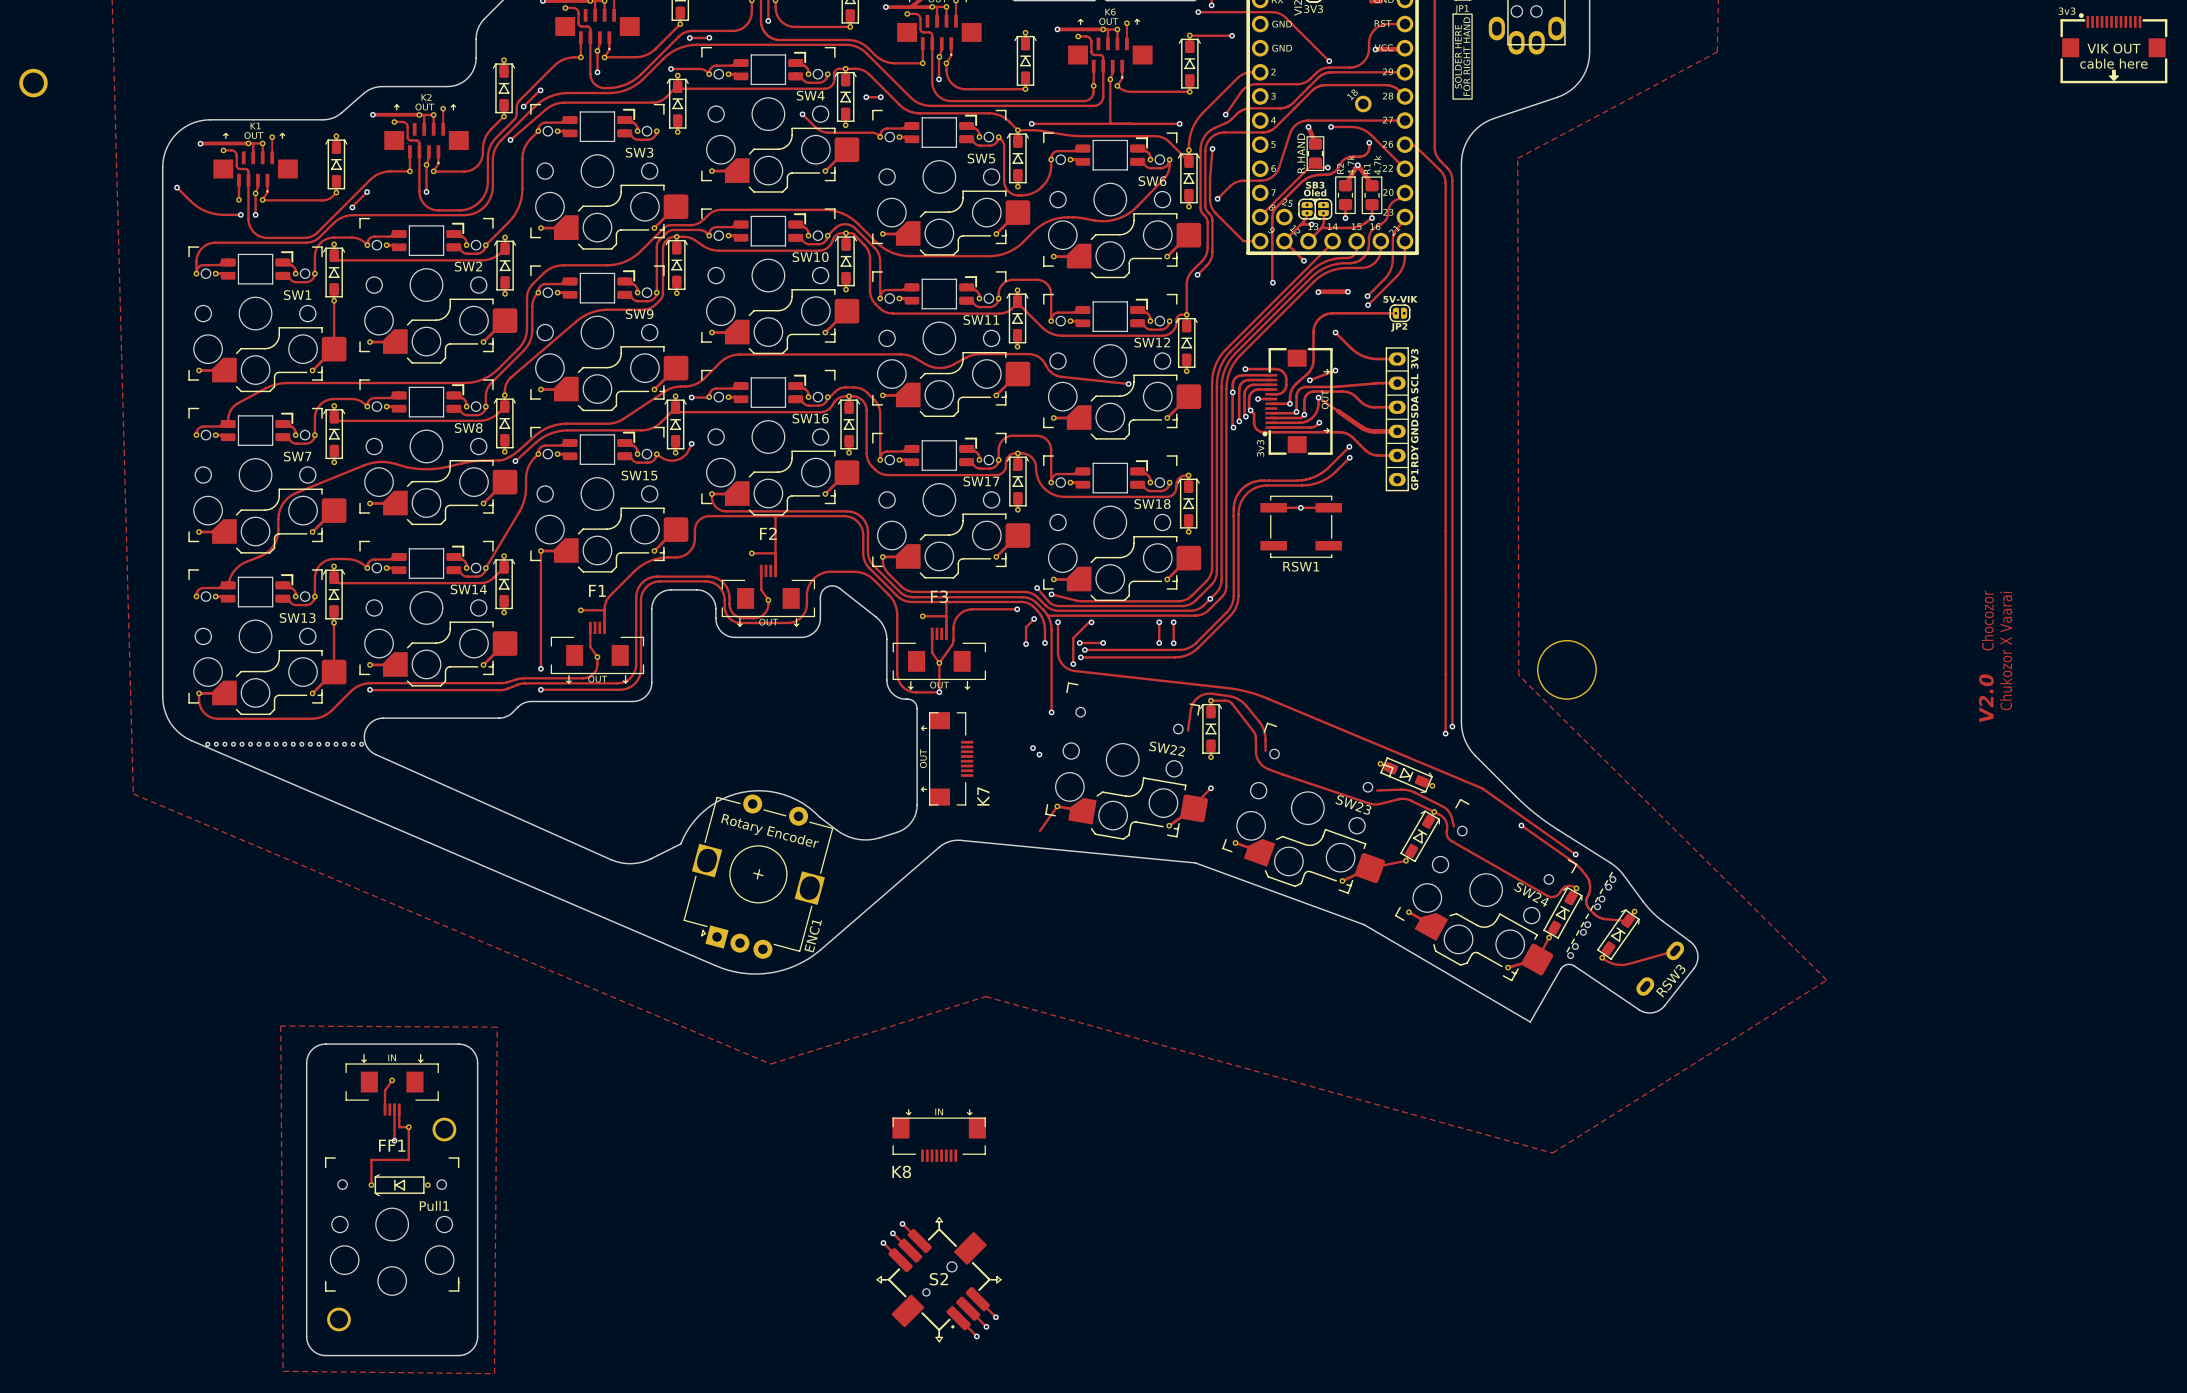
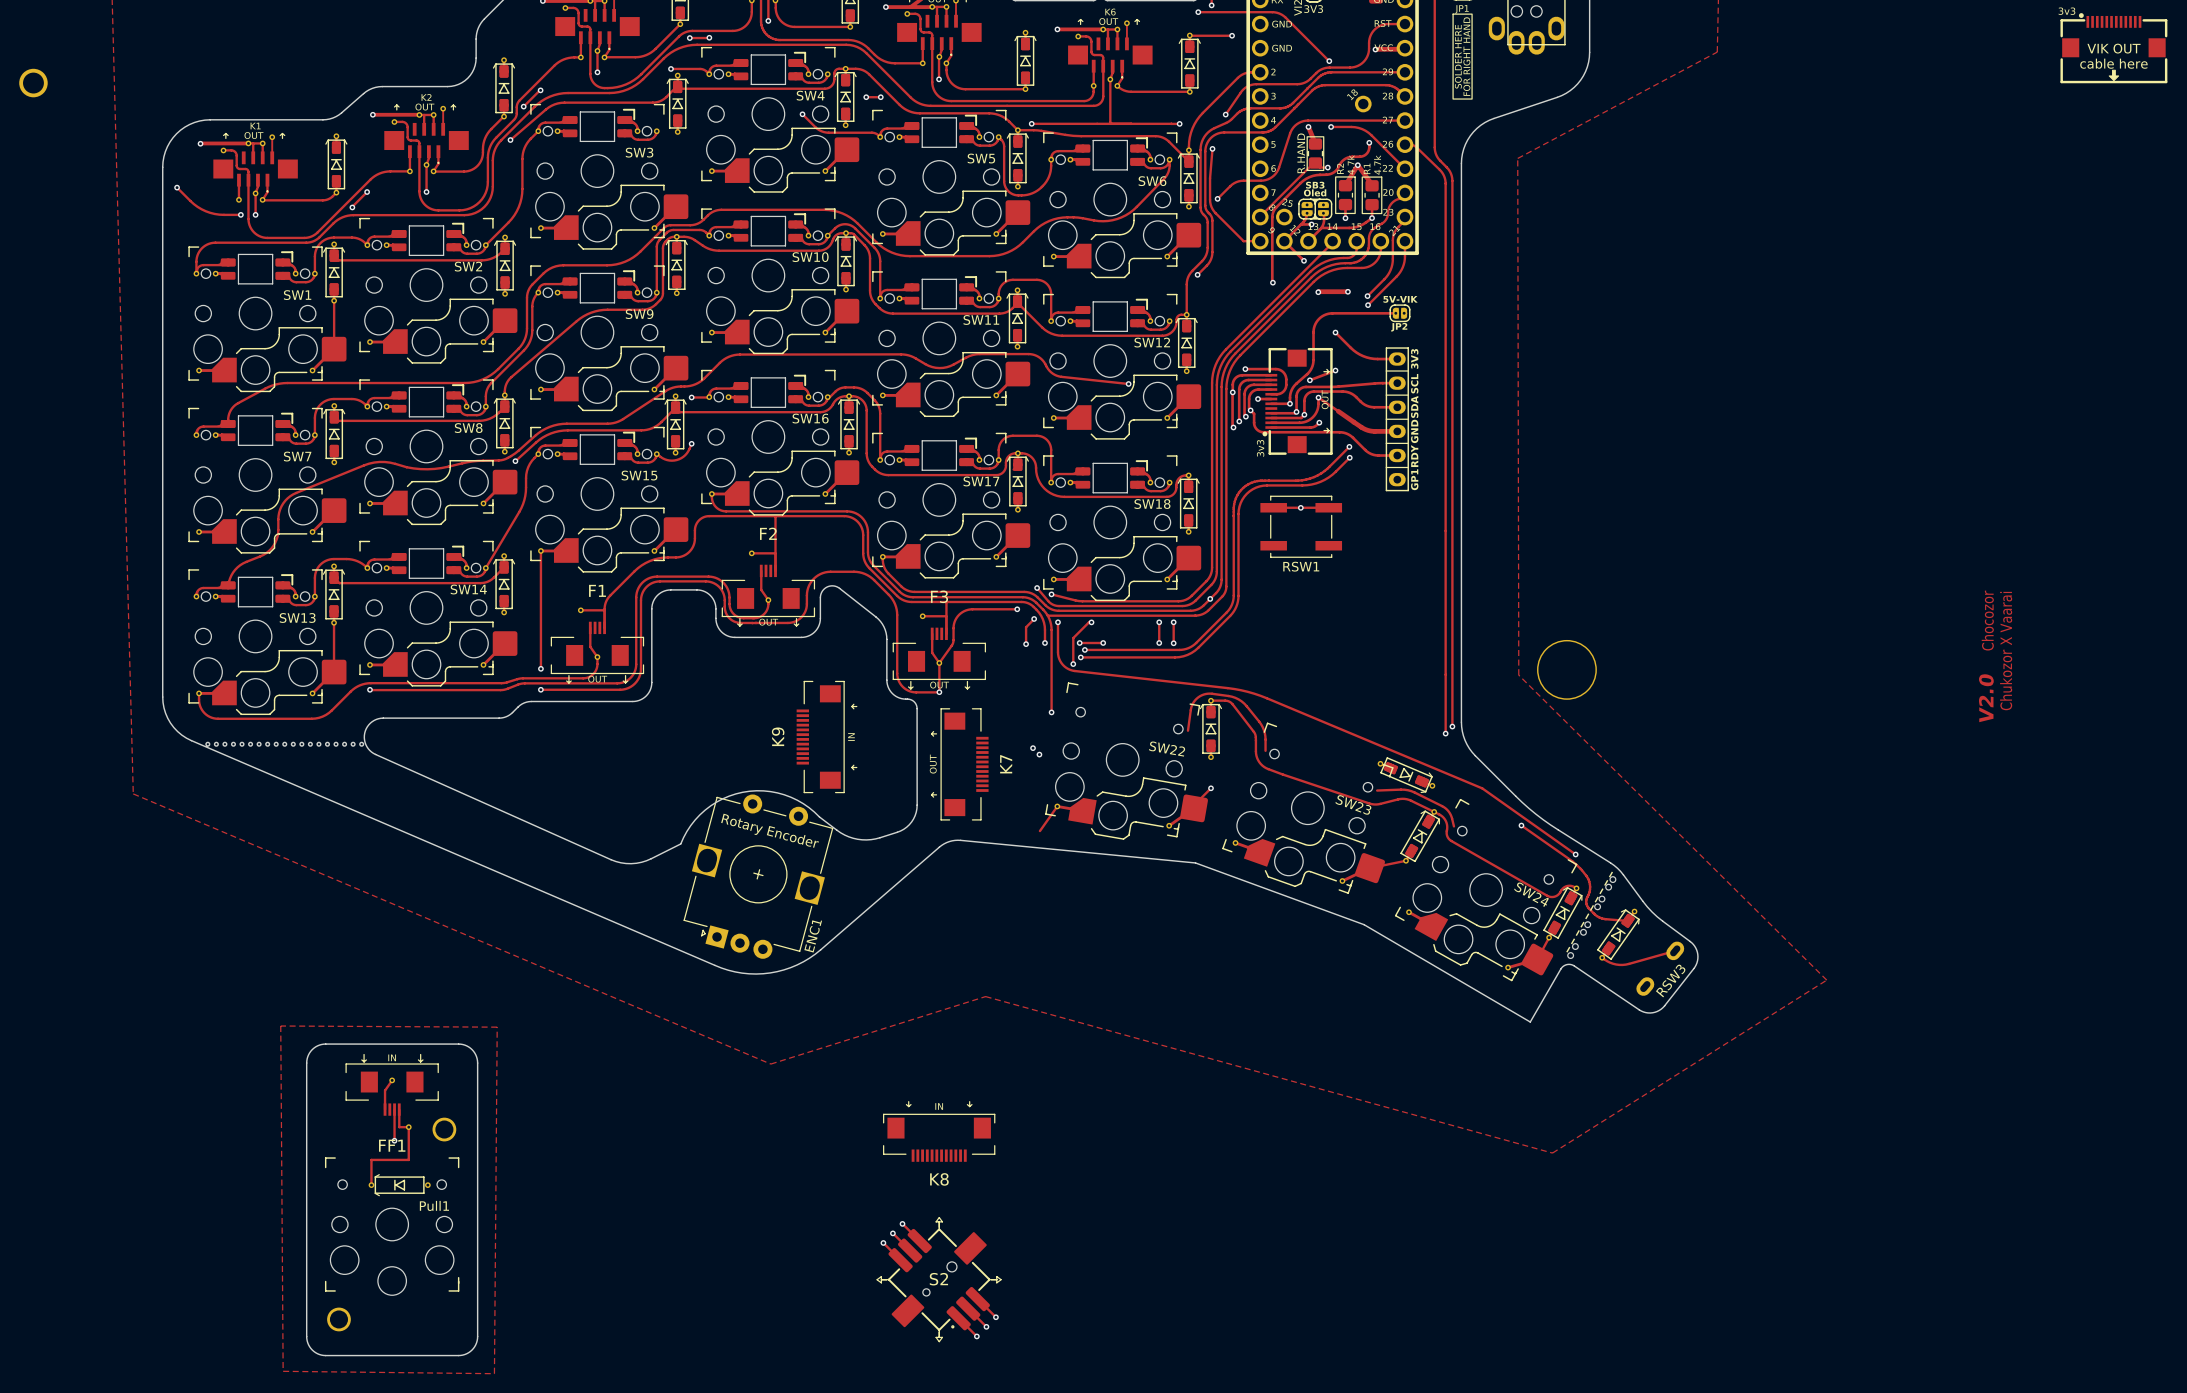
K7 footprint: [921, 712, 974, 806] -> [931, 708, 989, 821]
K9: none -> (826, 737)
K7 name position: K7 (983, 796) -> K7 (1006, 764)
K8 footprint: [892, 1109, 986, 1162] -> [883, 1101, 996, 1162]
K8 name position: K8 (901, 1171) -> K8 (939, 1179)

